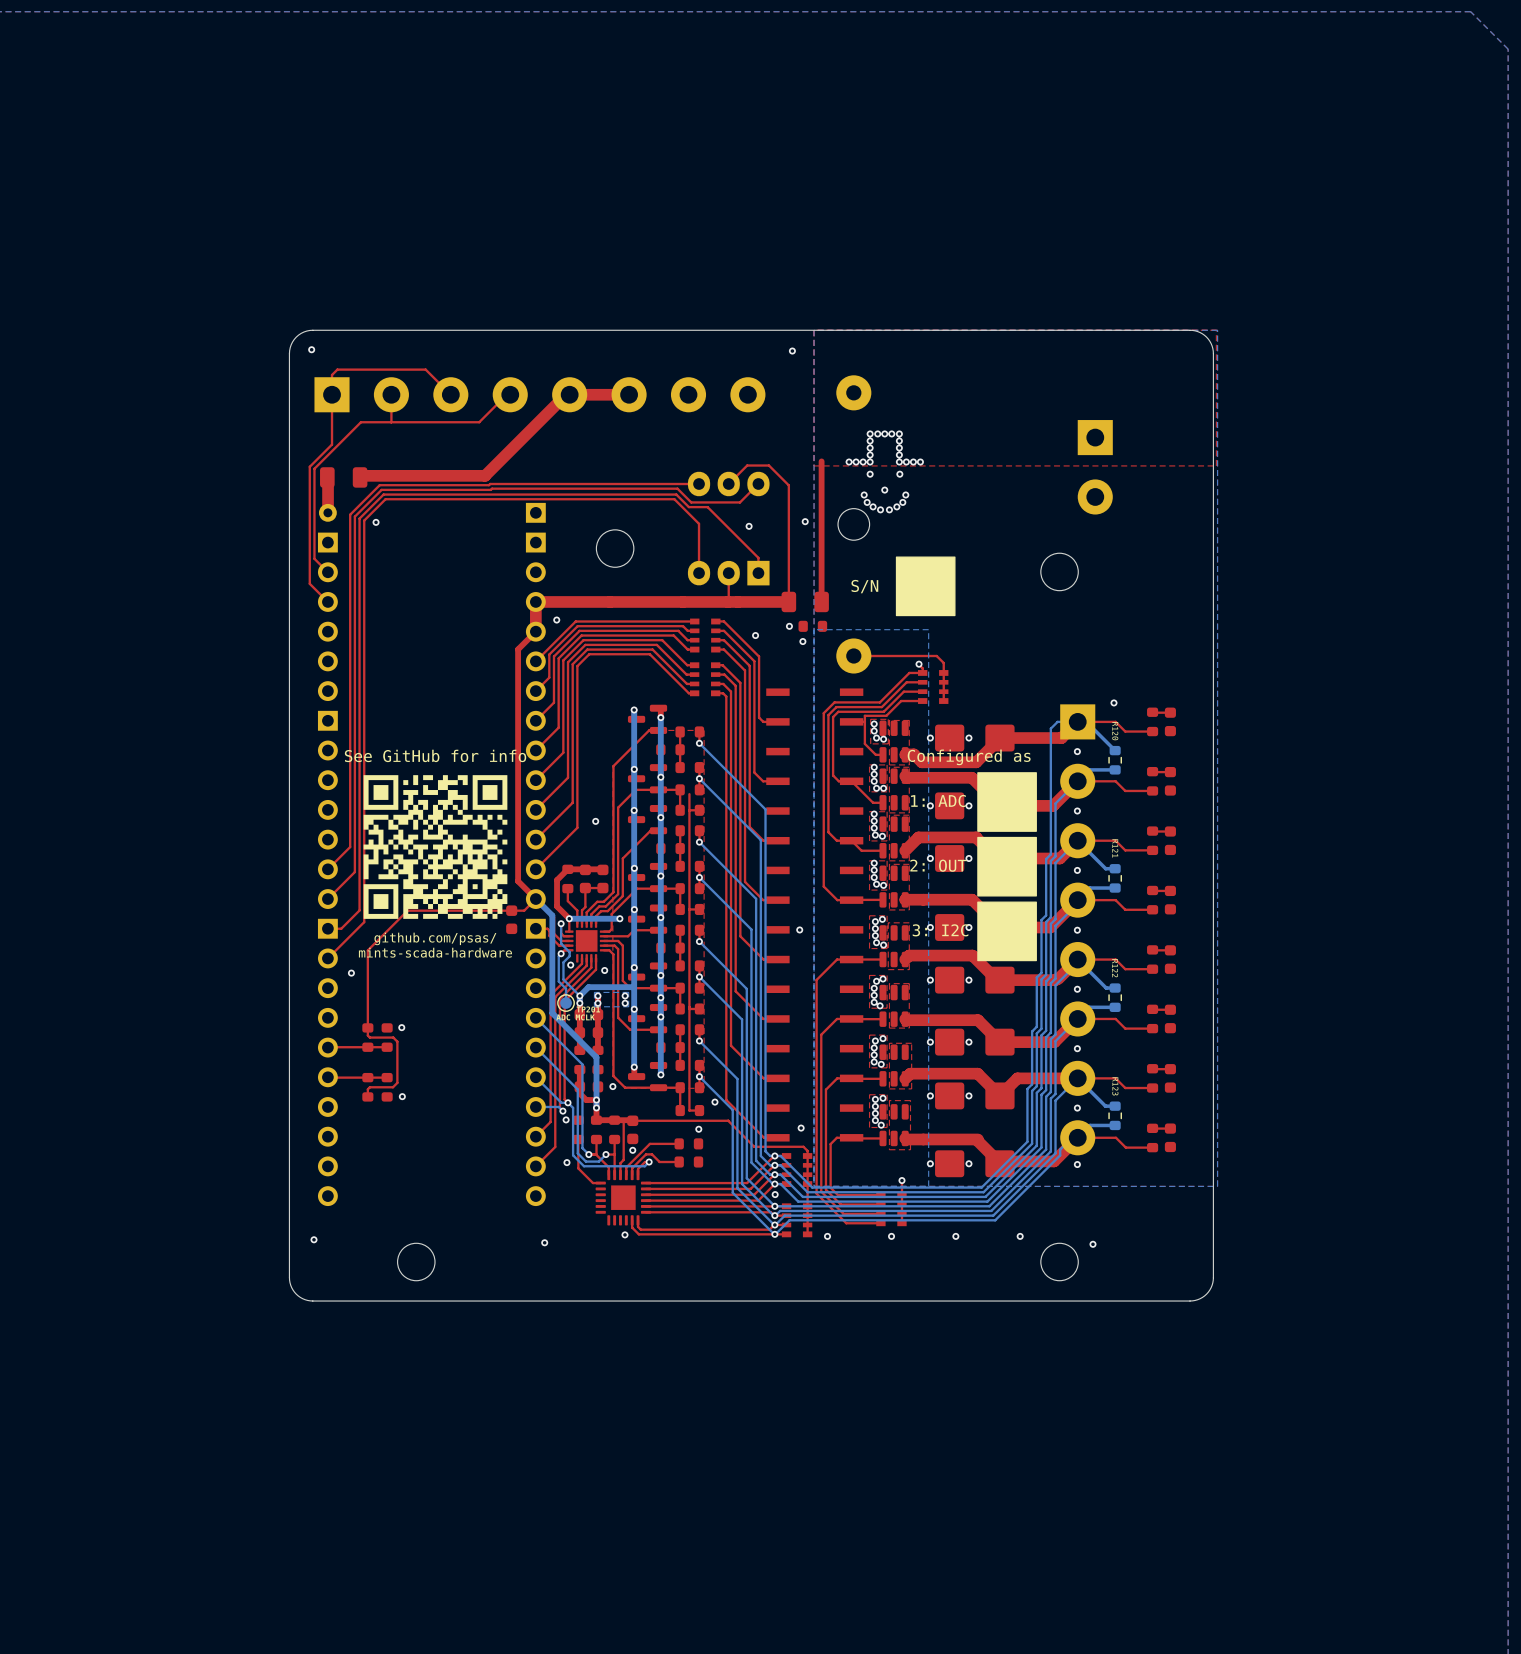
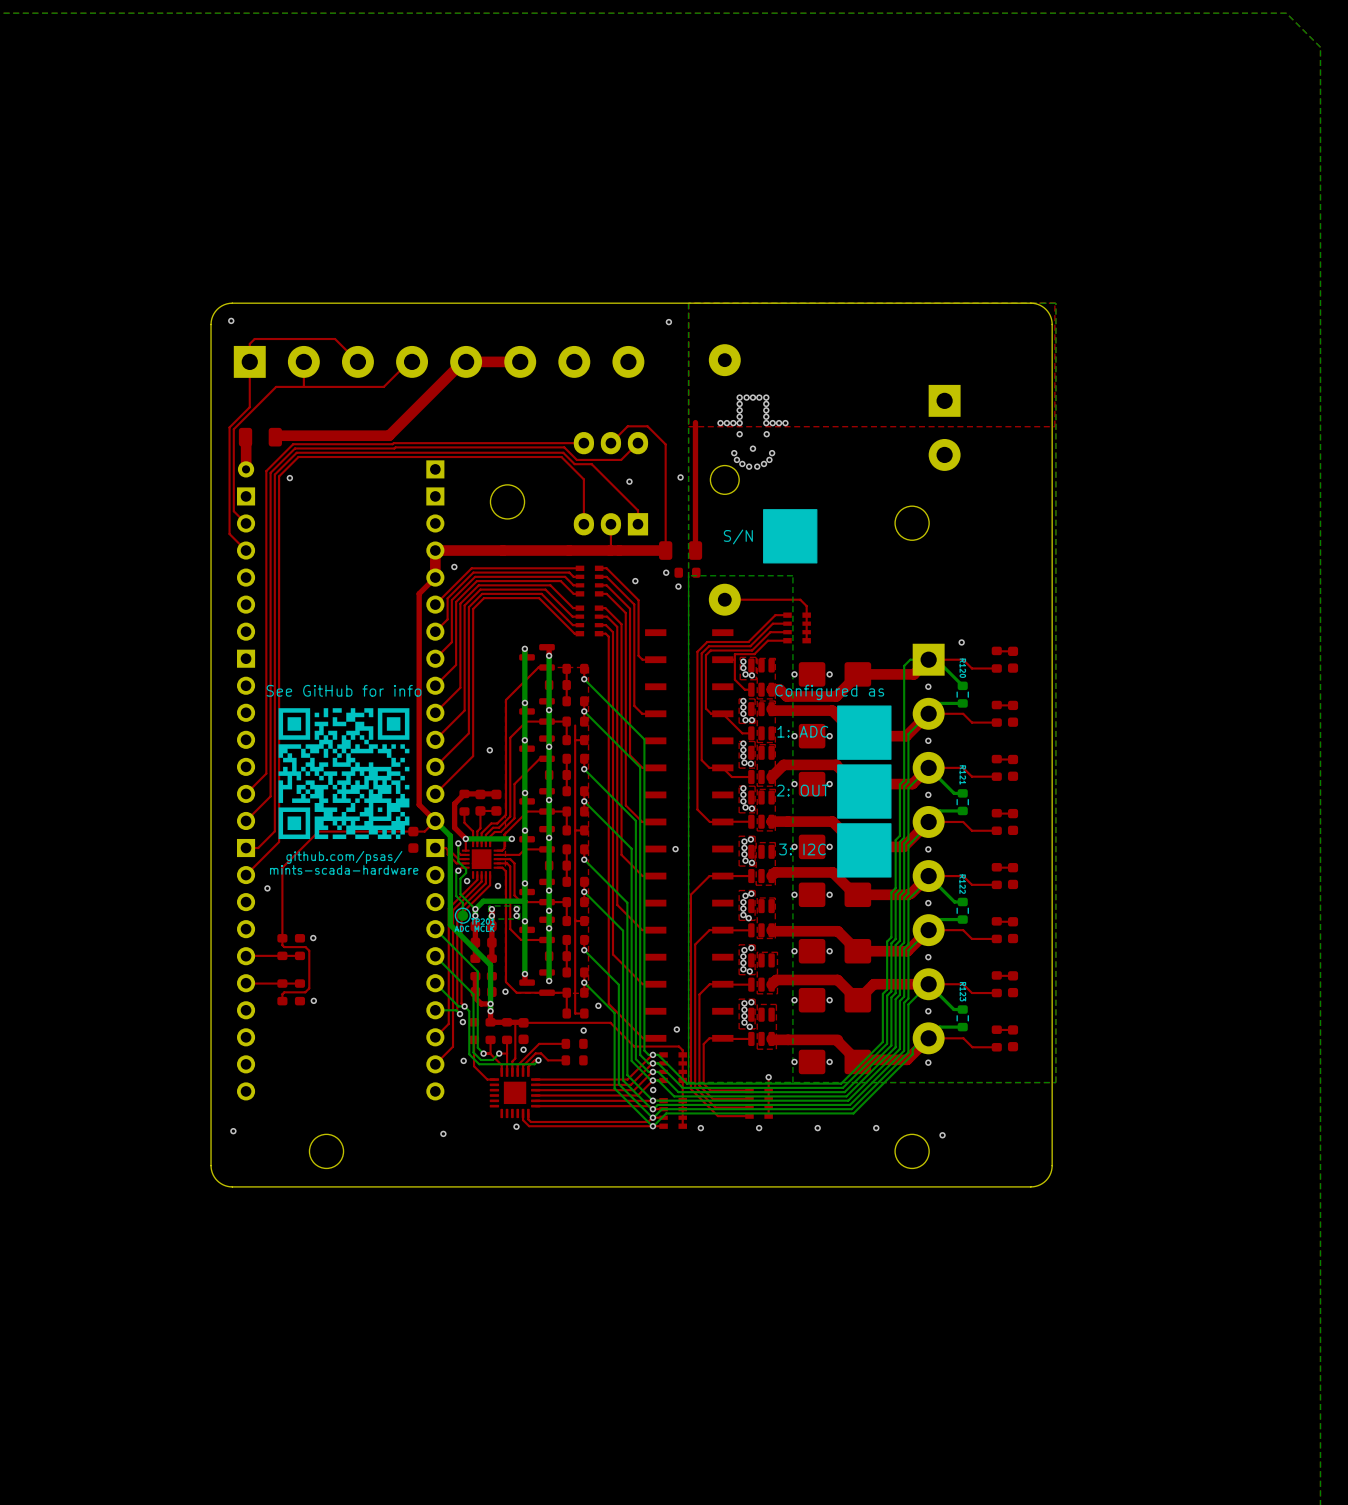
top track: (918, 664) (922, 668) (922, 672) -> none
via: (919, 664) -> none

